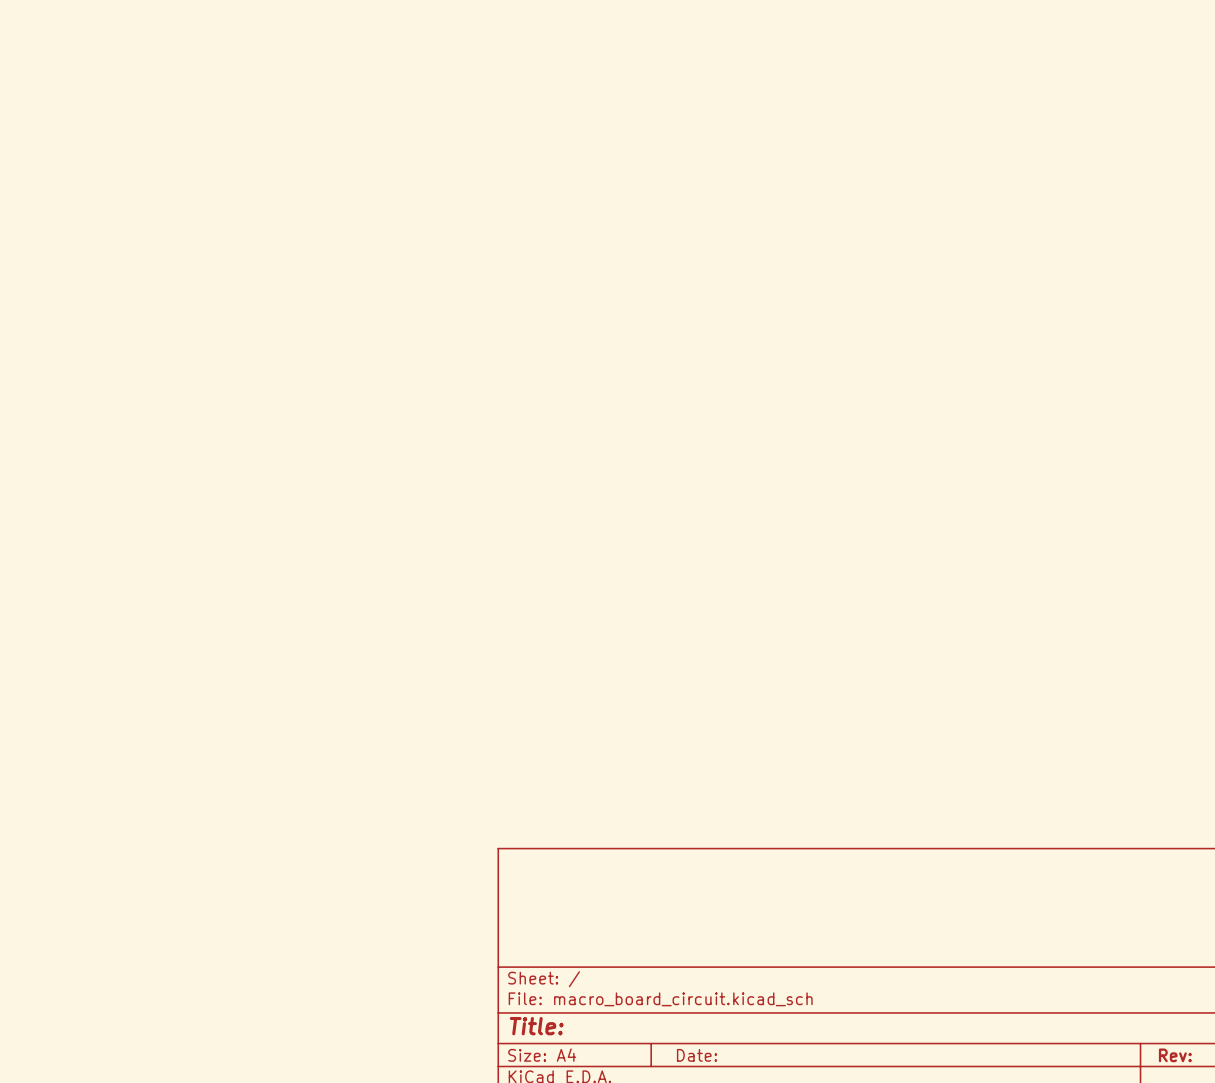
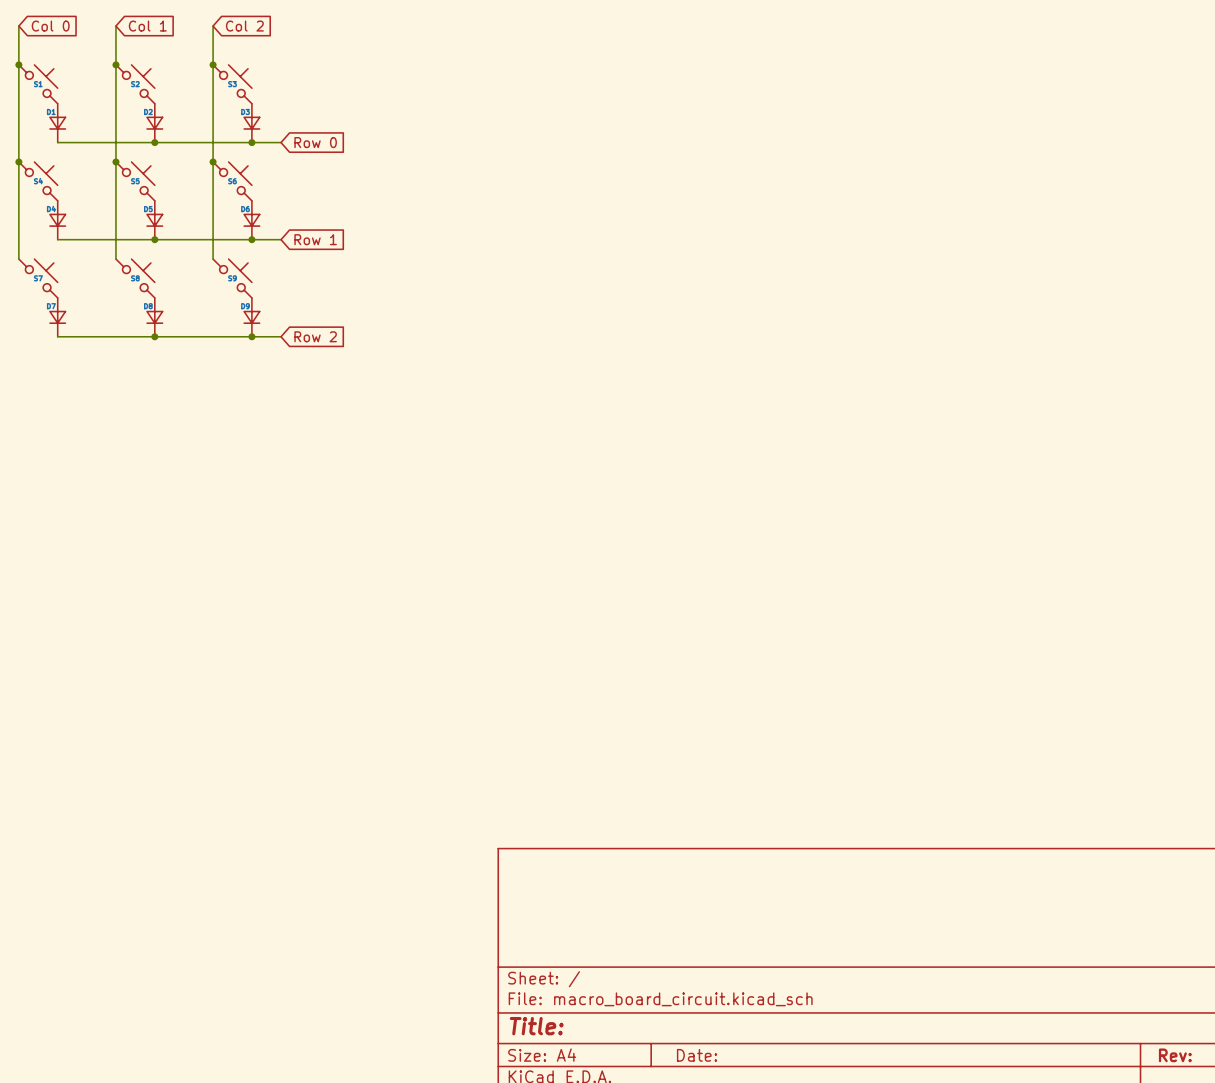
wire: none -> (18, 26) (18, 259)
global label: none -> Col 0 (50, 26)
wire: none -> (115, 26) (115, 259)
global label: none -> Col 1 (147, 26)
wire: none -> (213, 26) (213, 259)
global label: none -> Col 2 (244, 26)
junction: none -> (18, 64)
junction: none -> (115, 64)
junction: none -> (213, 64)
part: none -> (38, 84)
part: none -> (135, 84)
part: none -> (232, 84)
part: none -> (57, 123)
part: none -> (154, 123)
part: none -> (251, 123)
wire: none -> (57, 142) (281, 142)
junction: none -> (154, 142)
junction: none -> (251, 142)
global label: none -> Row 0 (315, 142)
junction: none -> (18, 162)
junction: none -> (115, 162)
junction: none -> (213, 162)
part: none -> (38, 181)
part: none -> (135, 181)
part: none -> (232, 181)
part: none -> (57, 220)
part: none -> (154, 220)
part: none -> (251, 220)
wire: none -> (57, 239) (281, 239)
junction: none -> (154, 239)
junction: none -> (251, 239)
global label: none -> Row 1 (315, 239)
part: none -> (38, 278)
part: none -> (135, 278)
part: none -> (232, 278)
part: none -> (57, 317)
part: none -> (154, 317)
part: none -> (251, 317)
wire: none -> (57, 336) (281, 336)
junction: none -> (154, 336)
junction: none -> (251, 336)
global label: none -> Row 2 (315, 336)

